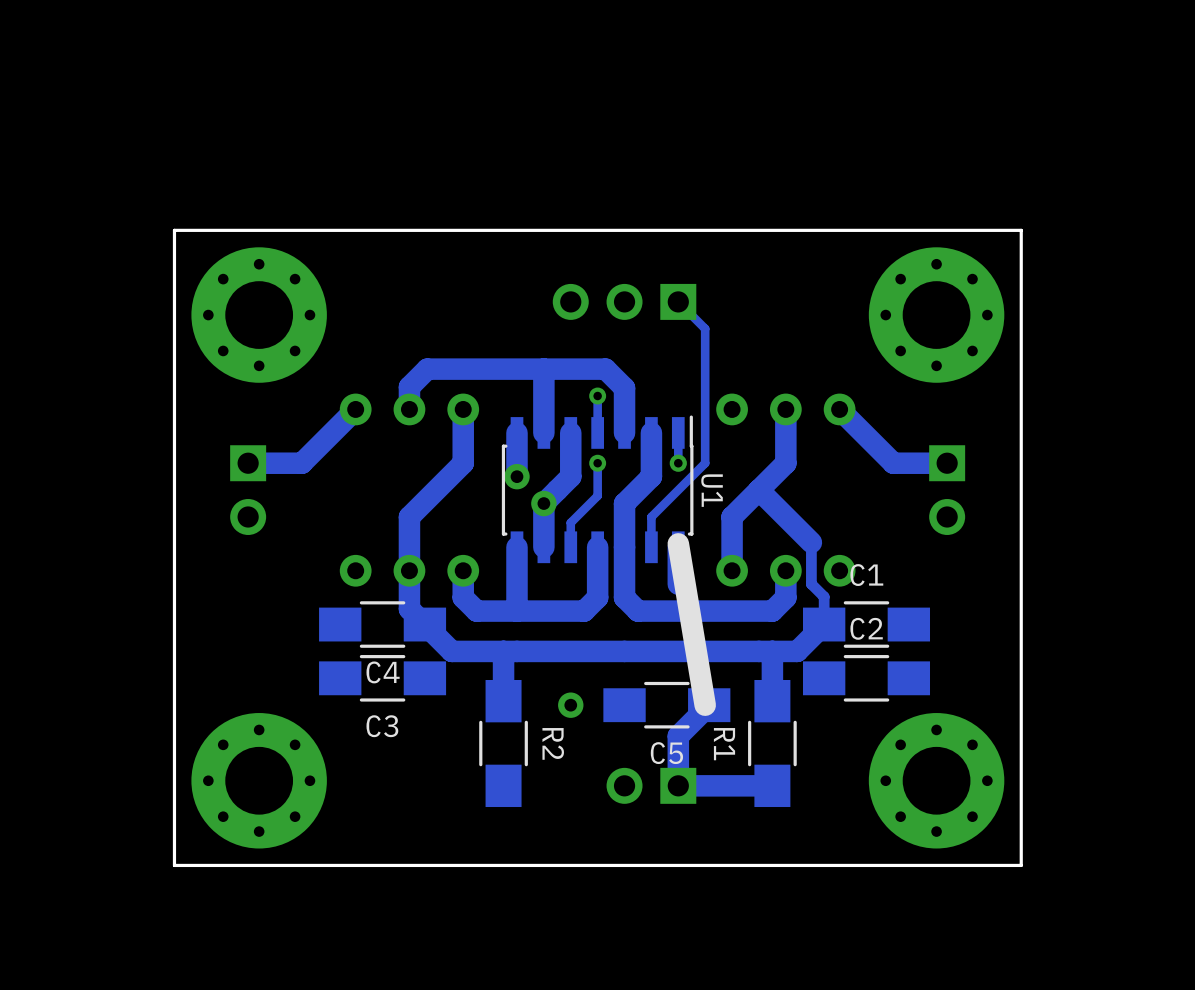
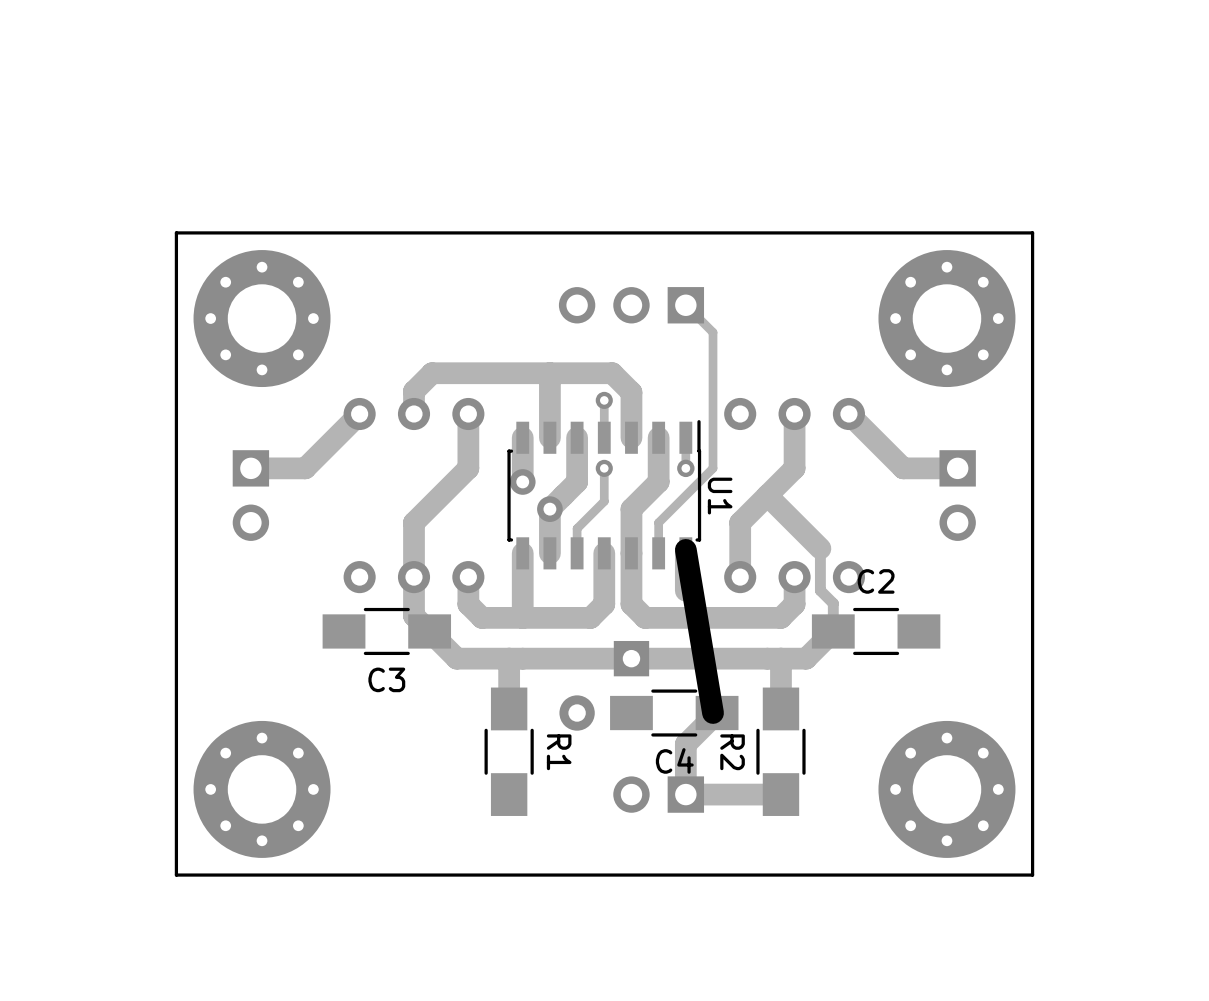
C1 name: C1 (866, 575) -> C2 (876, 581)
C4 name: C4 (383, 672) -> C3 (386, 679)
C3: (382, 678) -> none
part: none -> (604, 685)
C2: (866, 678) -> none
via: (570, 705) -> none
R2 name: R2 (553, 743) -> R1 (559, 752)
R1 name: R1 (724, 744) -> R2 (732, 752)
C5 name: C5 (666, 753) -> C4 (674, 760)

